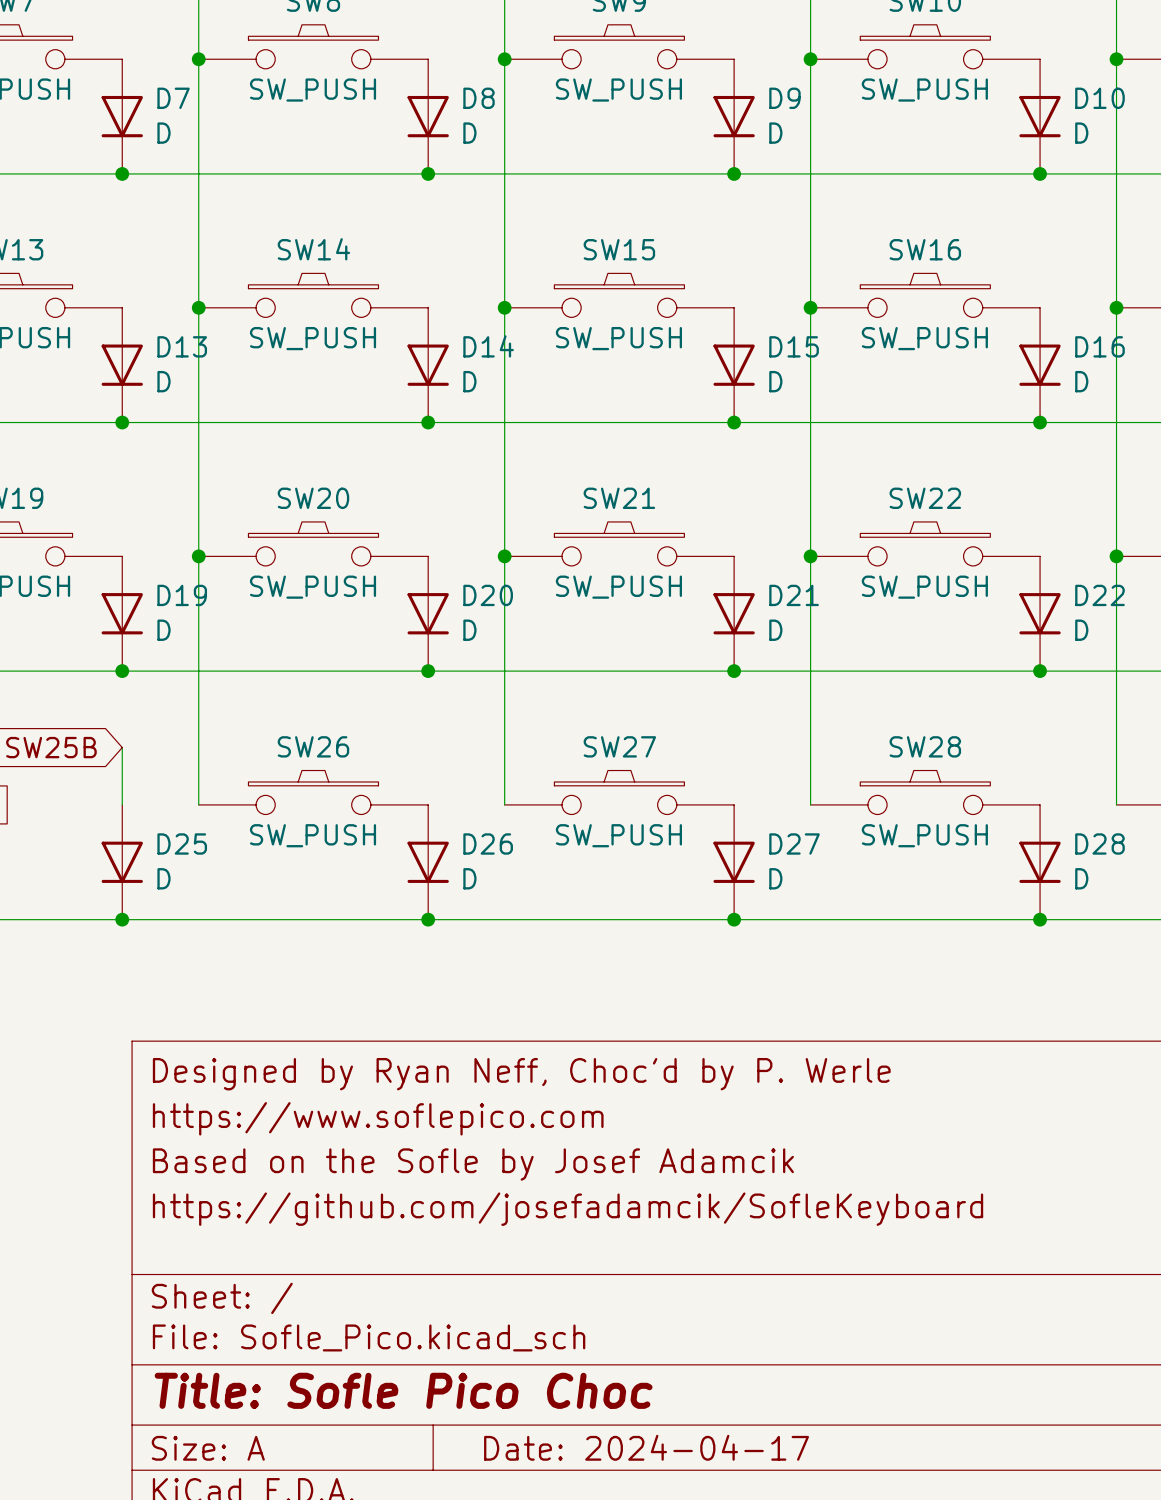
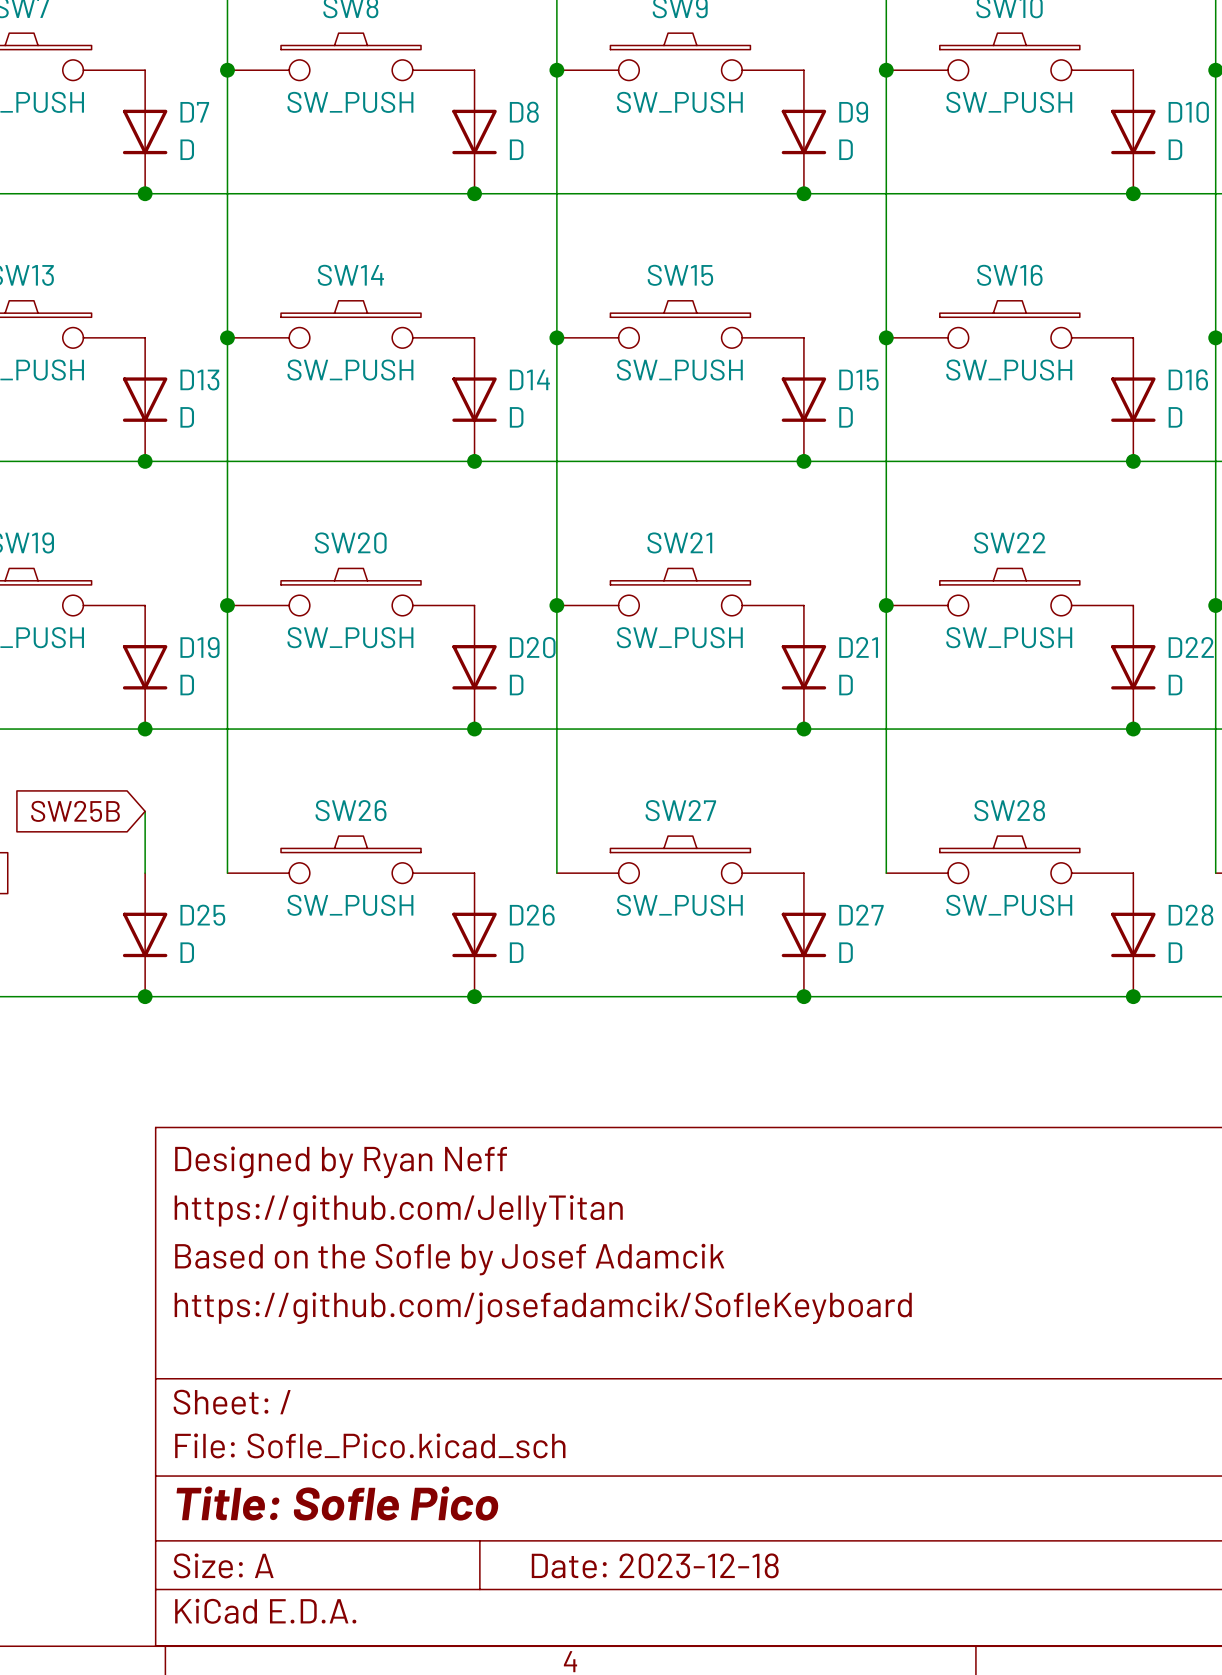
title block: Designed by Ryan Neff, Choc'd by P. Werle (521, 1074) -> Designed by Ryan Neff (341, 1162)
title block: https://www.soflepico.com (378, 1118) -> https://github.com/JellyTitan (398, 1210)
title block: Title: Sofle Pico Choc (403, 1390) -> Title: Sofle Pico (337, 1503)
title block: Date: 2024-04-17 (646, 1447) -> Date: 2023-12-18 (655, 1565)

